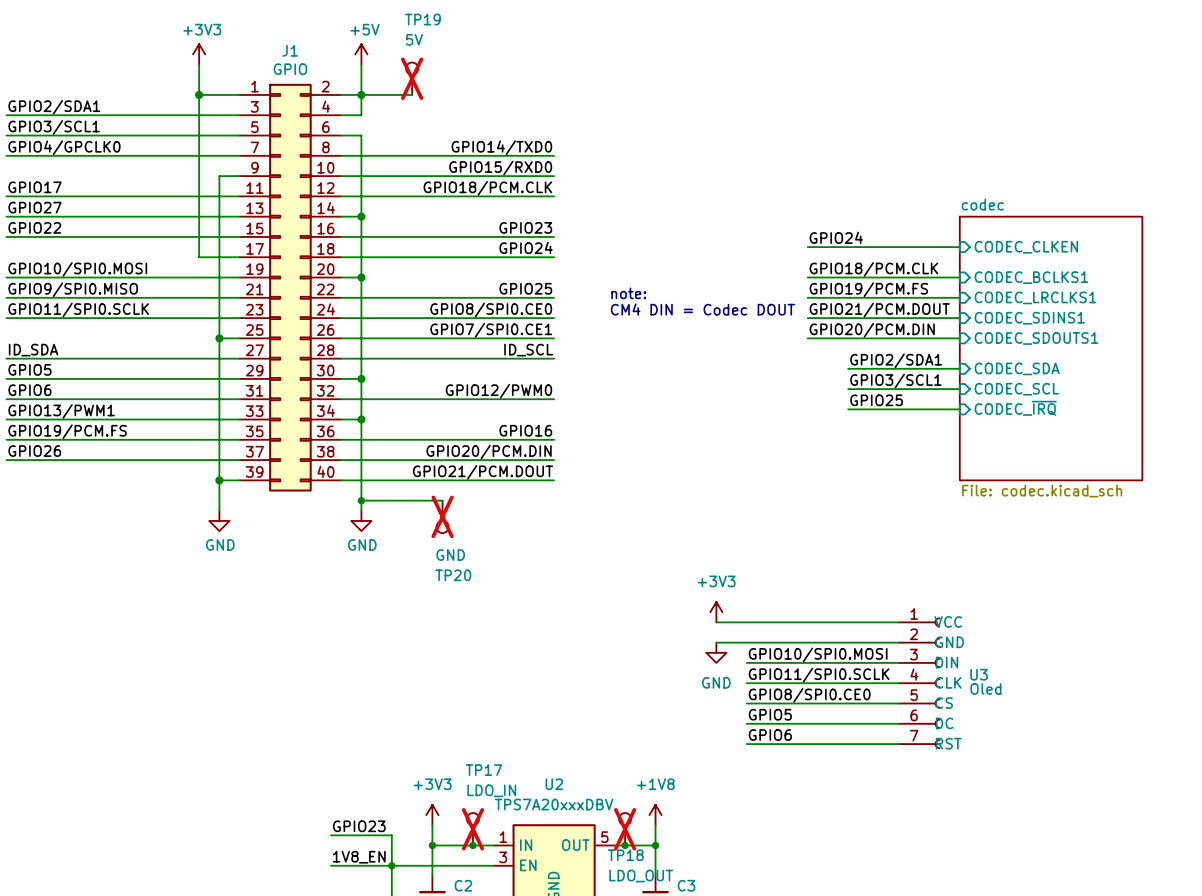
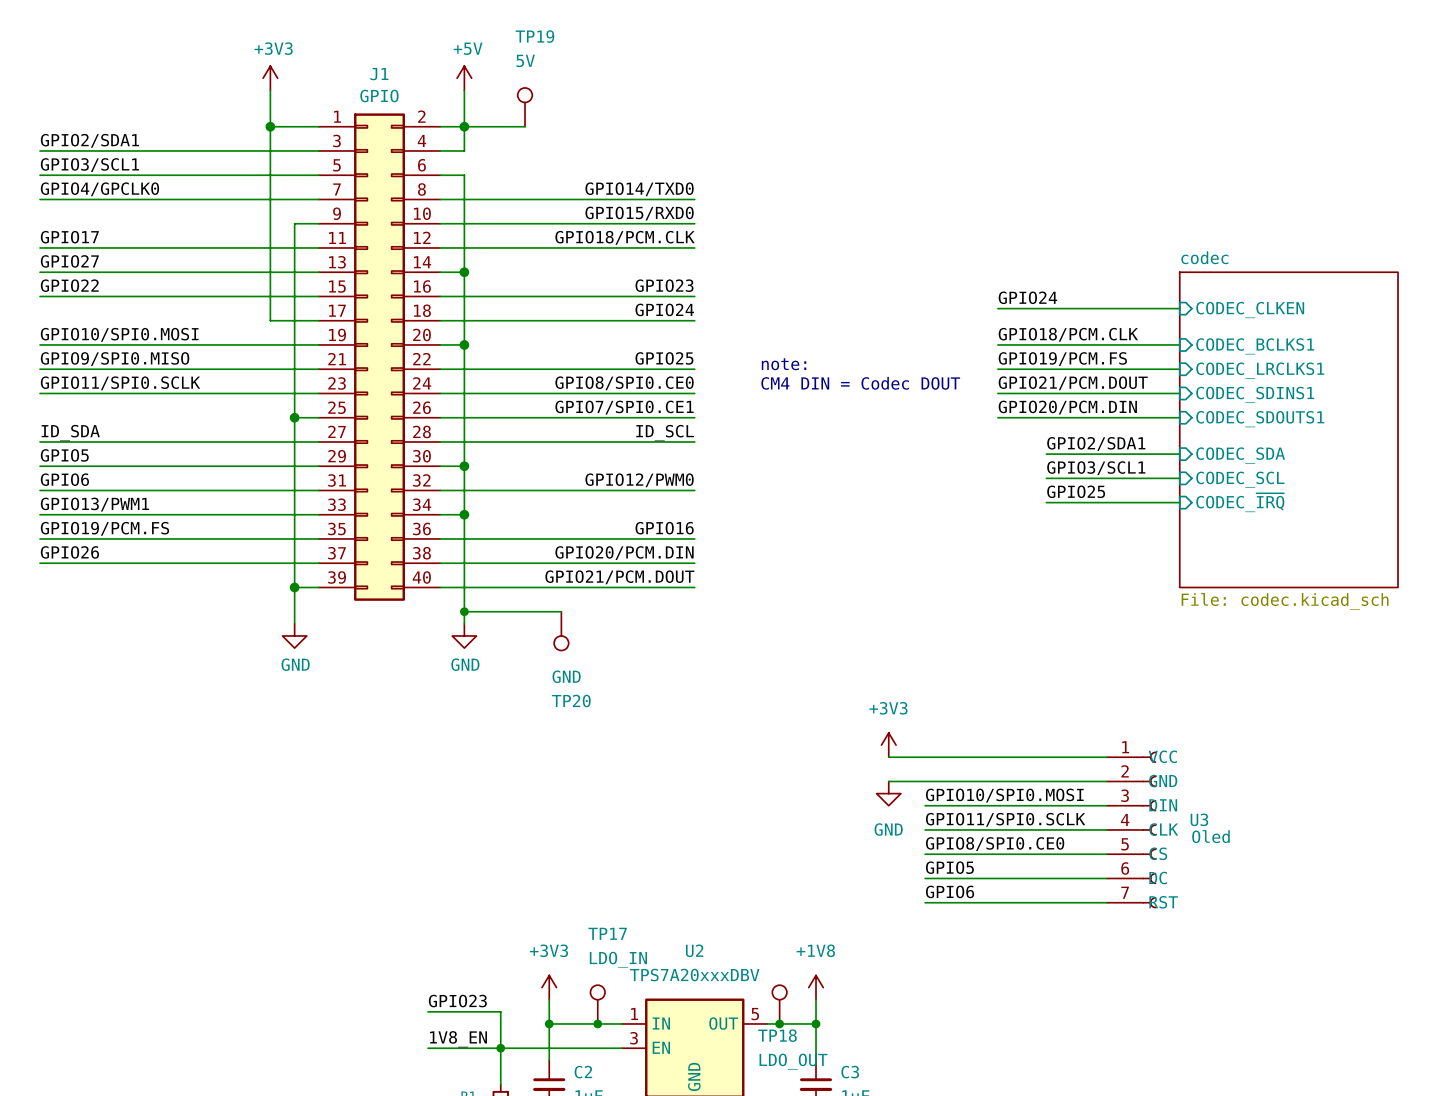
TP19 do-not-place cross: (412, 78) -> none
TP20 do-not-place cross: (442, 516) -> none
TP17 do-not-place cross: (472, 829) -> none
TP18 do-not-place cross: (625, 829) -> none

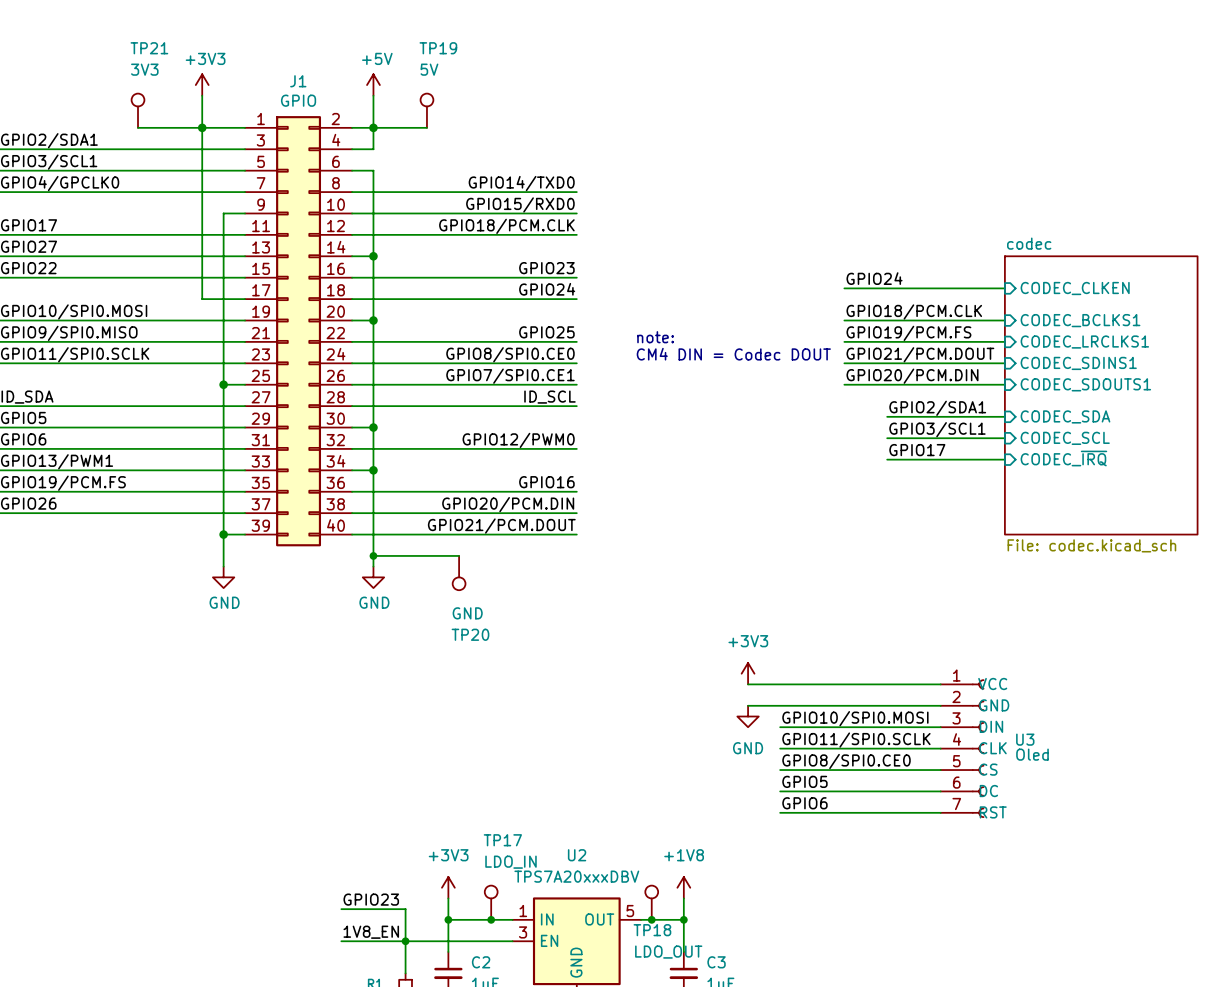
TP21: none -> 3V3 (138, 110)
wire: none -> (138, 127) (202, 127)
label: GPIO25 (1076, 491) -> GPIO17 (917, 450)

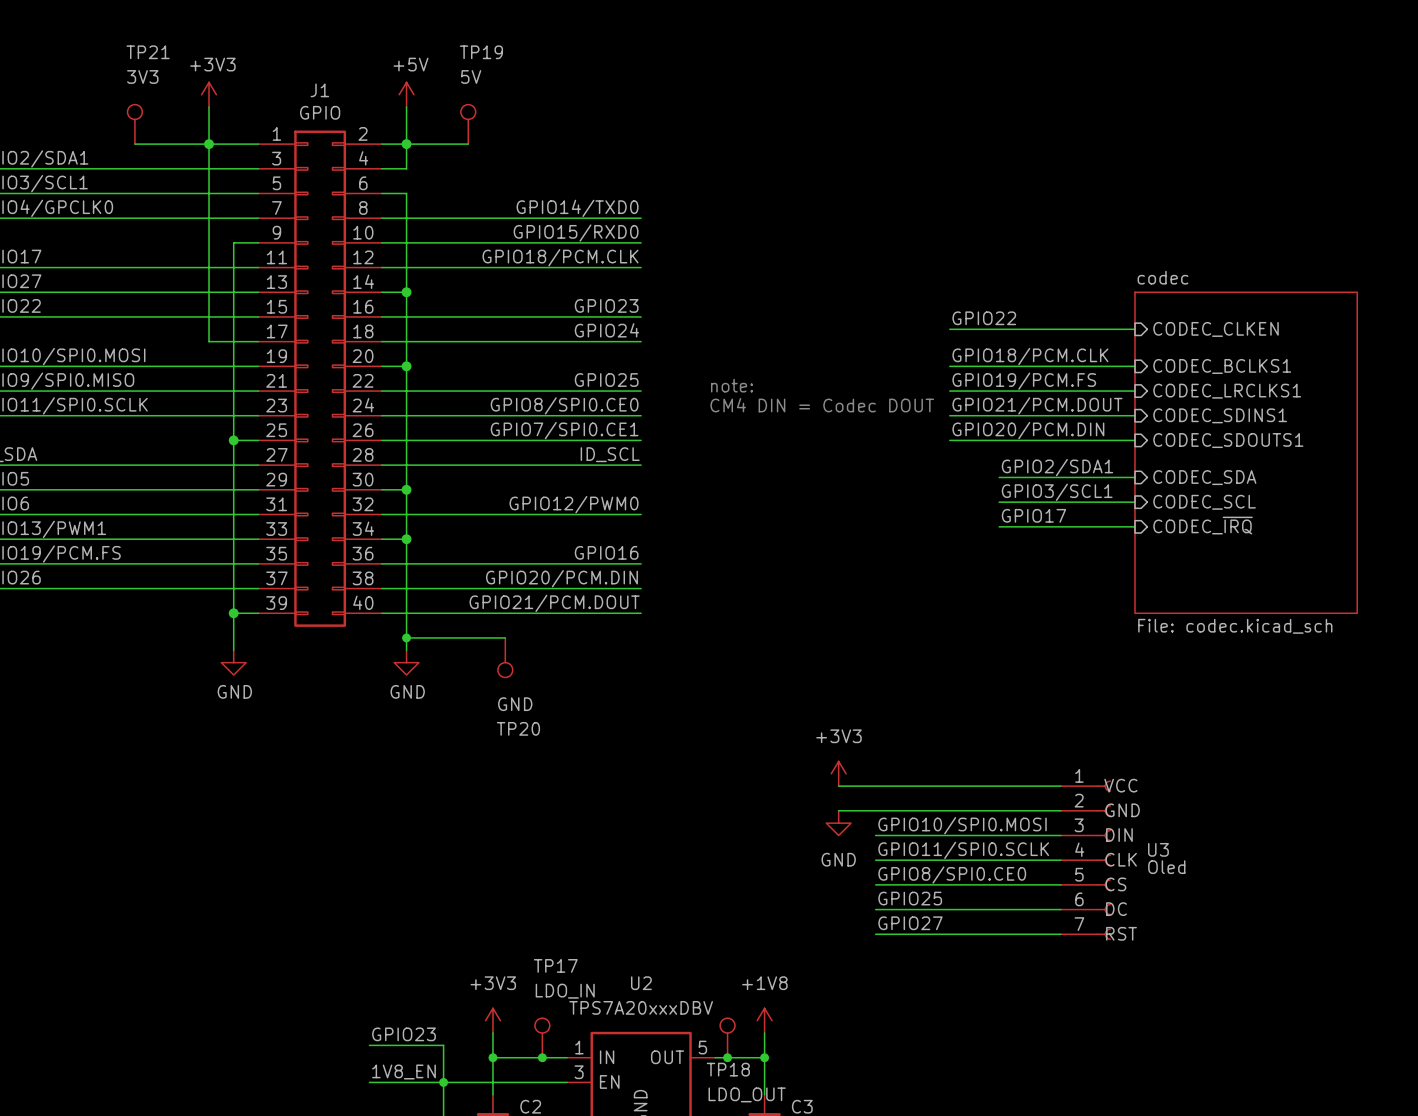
label: GPIO24 (874, 278) -> GPIO22 (984, 318)
label: GPIO5 (804, 781) -> GPIO25 (910, 898)
label: GPIO6 (804, 803) -> GPIO27 (910, 923)

